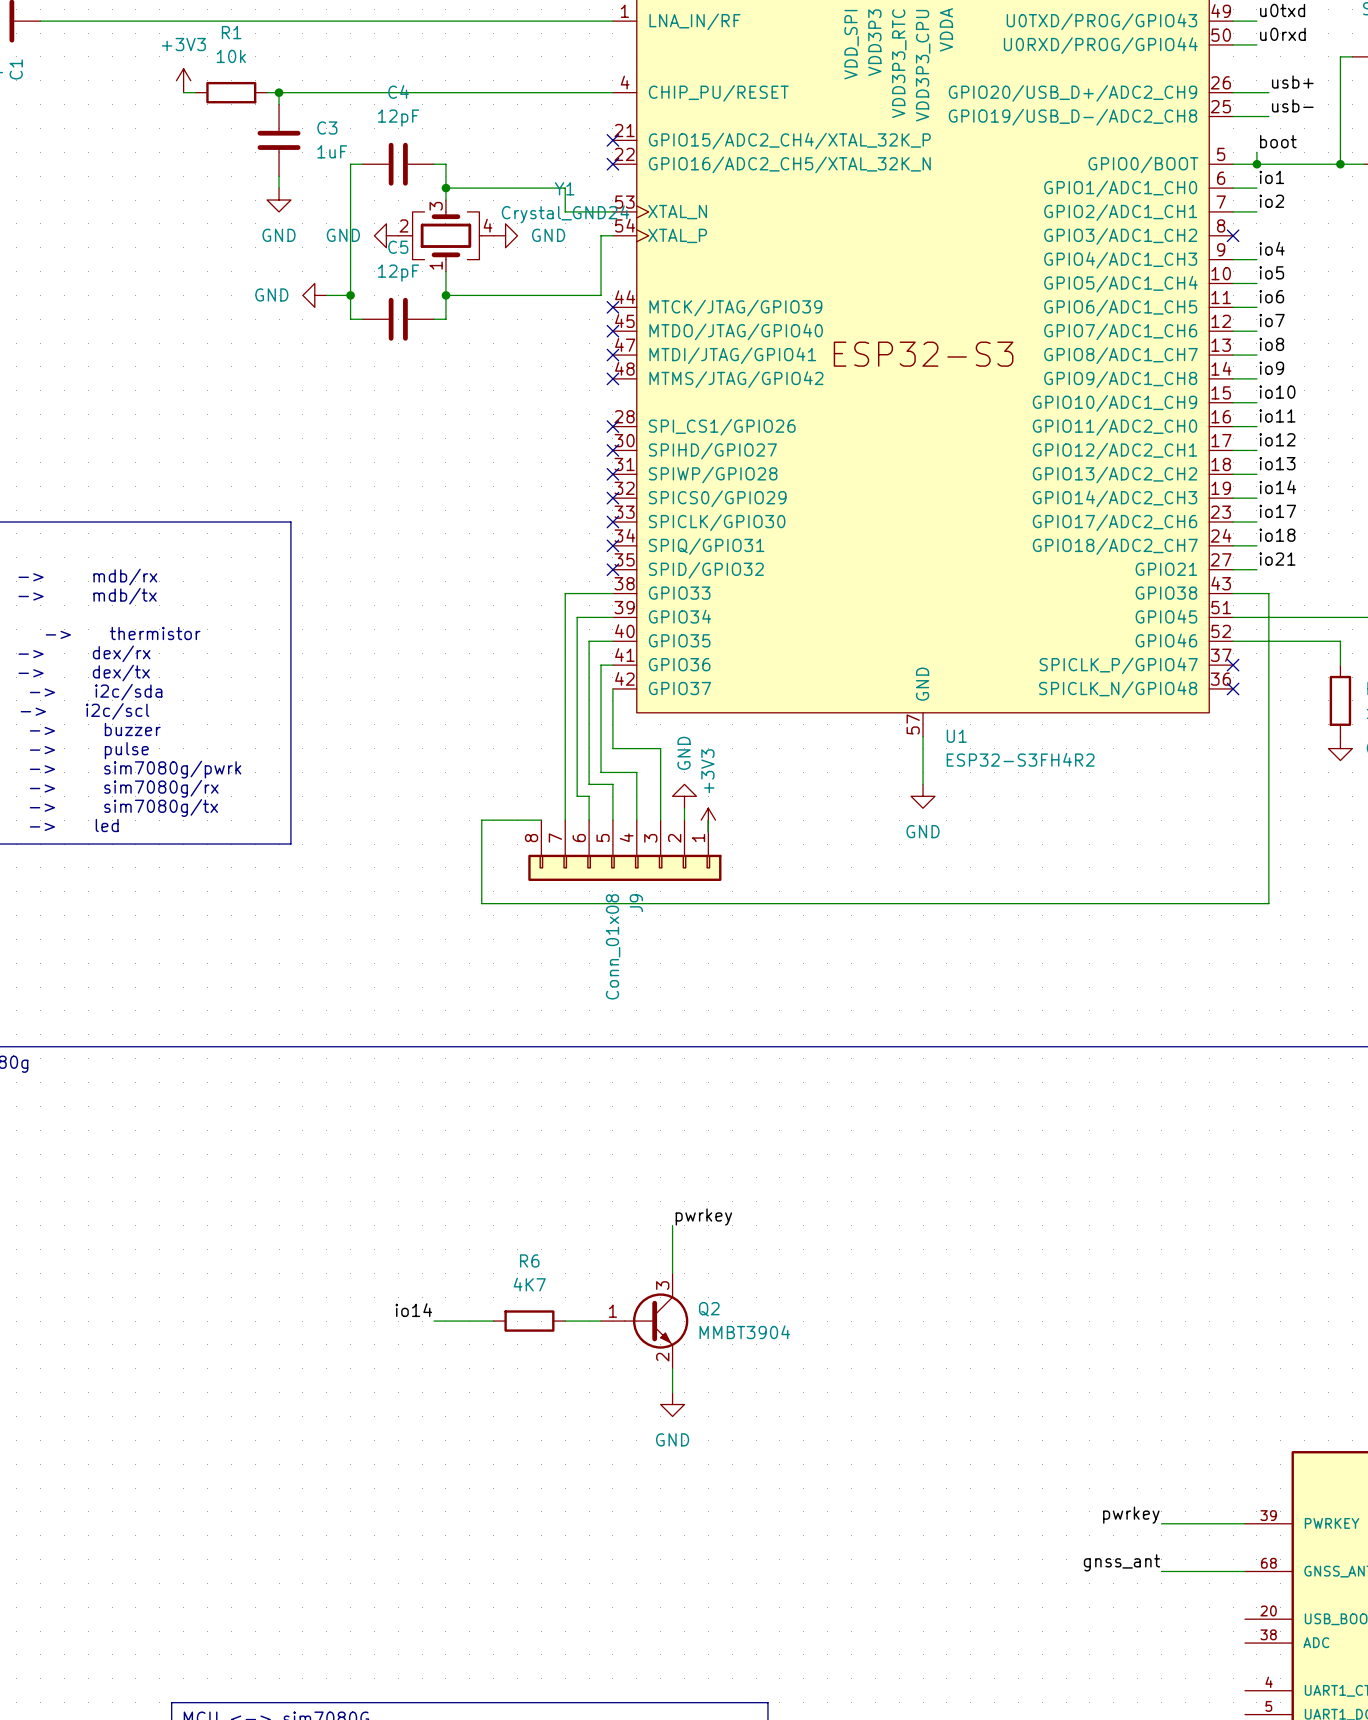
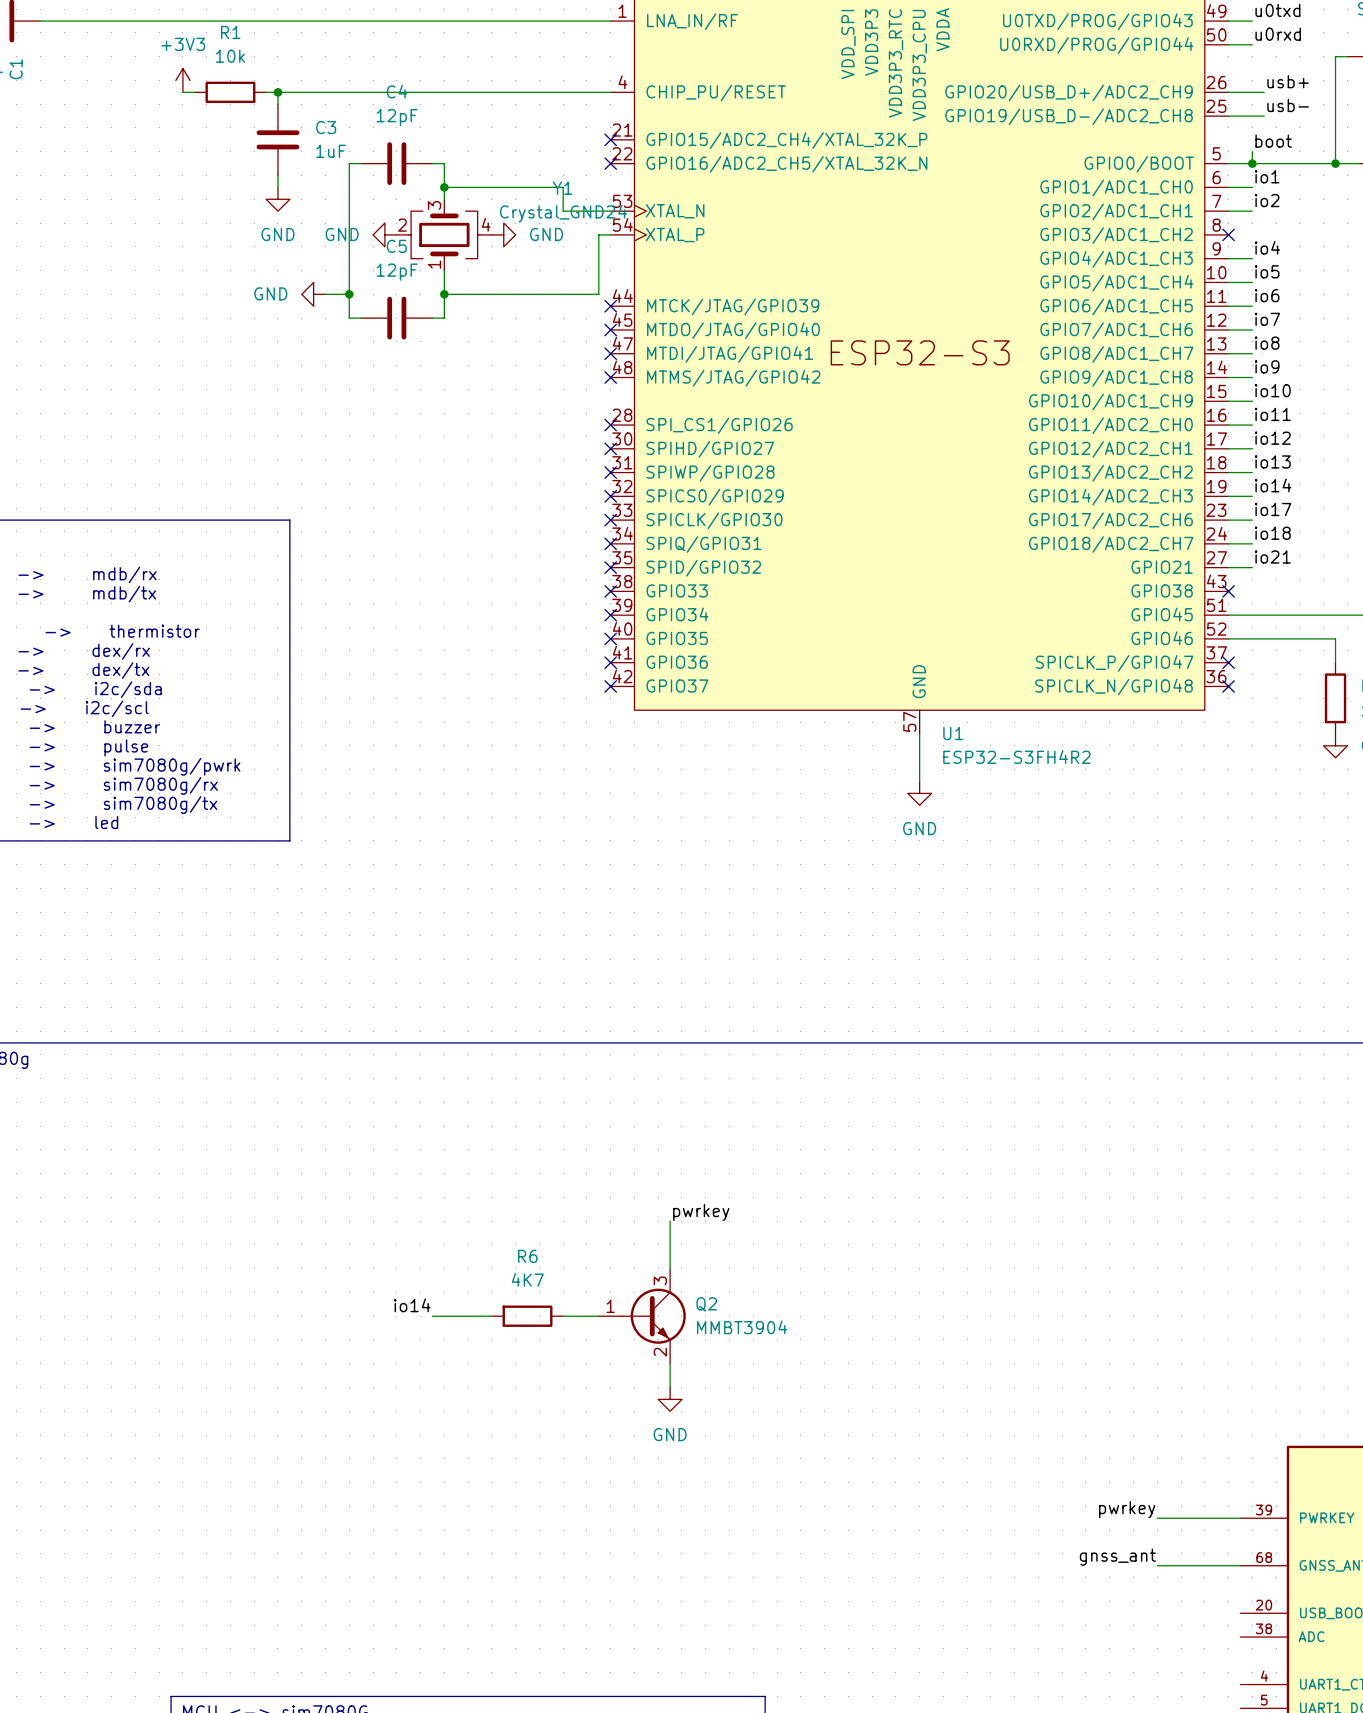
wire: (612, 593) (565, 593) (565, 820) -> none
no-connect mark: none -> (610, 591)
wire: (1233, 593) (1268, 593) (1268, 903) (481, 903) (481, 820) (541, 820) -> none
no-connect mark: none -> (1228, 591)
wire: (612, 617) (577, 617) (577, 796) (589, 796) (589, 820) -> none
no-connect mark: none -> (610, 615)
wire: (612, 641) (589, 641) (589, 784) (612, 784) (612, 820) -> none
no-connect mark: none -> (610, 638)
wire: (612, 665) (601, 665) (601, 772) (636, 772) (636, 820) -> none
no-connect mark: none -> (610, 662)
wire: (612, 688) (612, 748) (660, 748) (660, 820) -> none
no-connect mark: none -> (610, 686)
power symbol: GND (684, 796) -> none
wire: (684, 808) (684, 820) -> none
wire: (708, 820) (708, 832) -> none
power symbol: +3V3 (708, 820) -> none
J9: Conn_01x08 (624, 850) -> none

